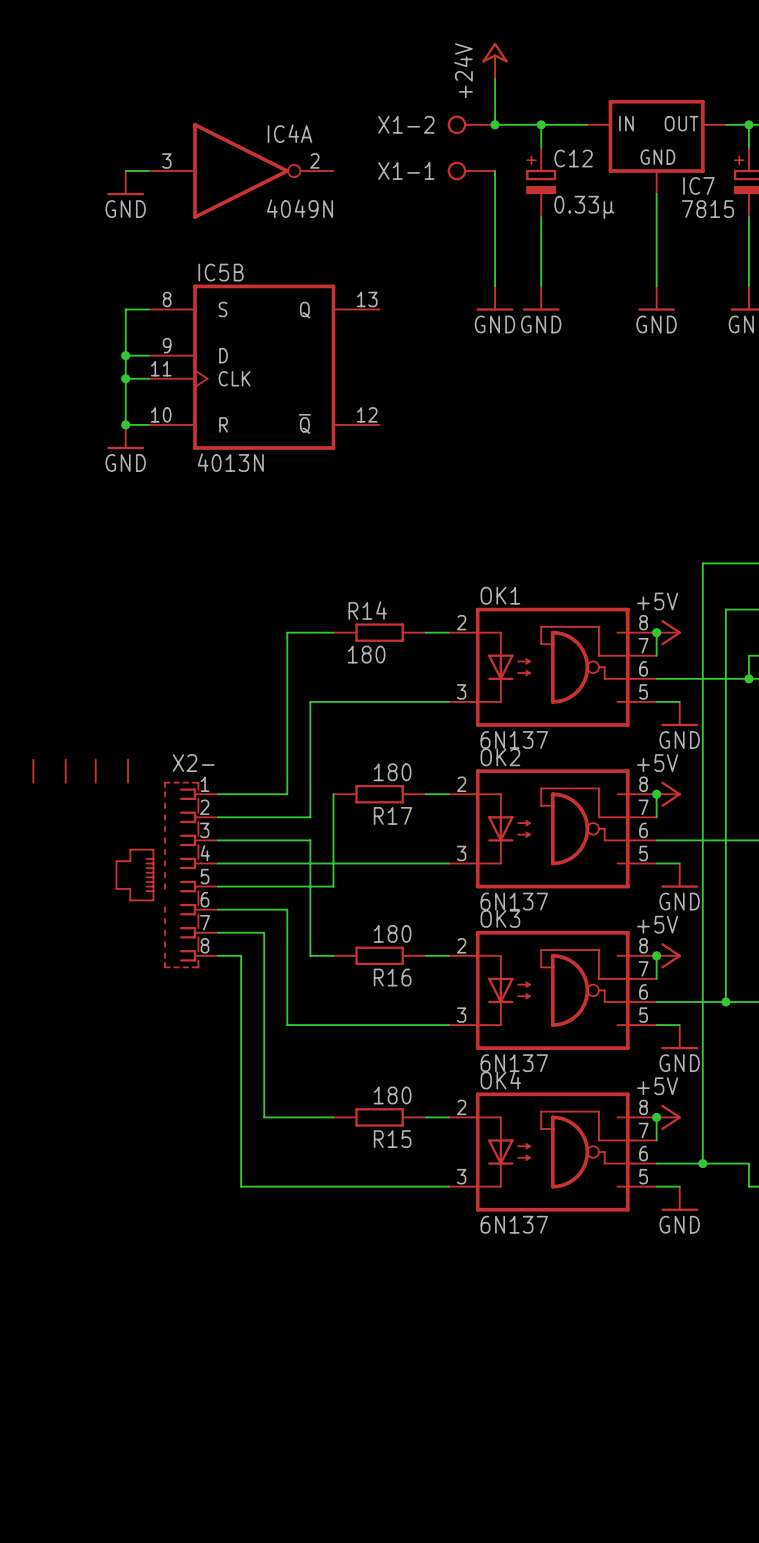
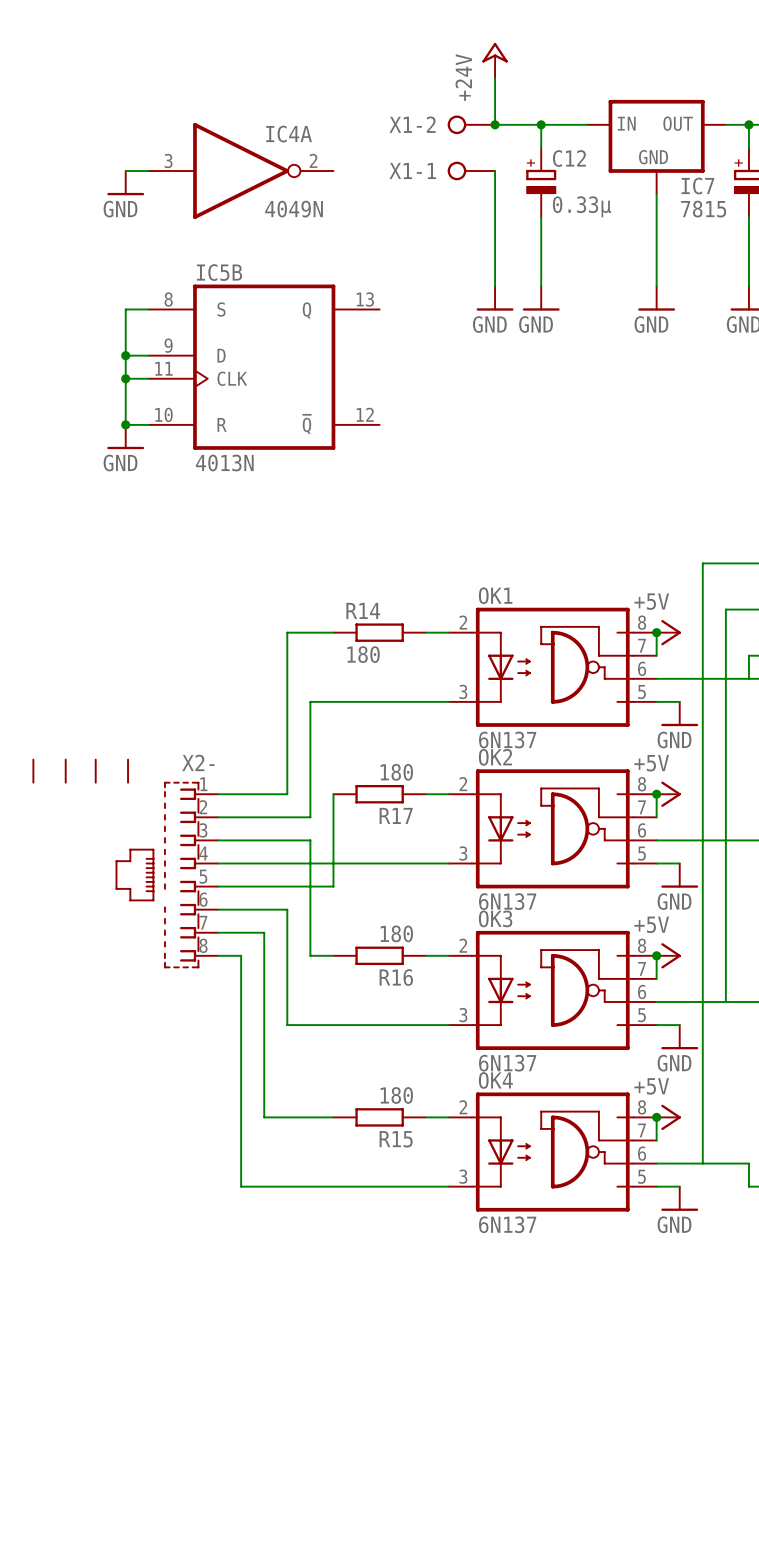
junction: (748, 678) -> none
junction: (725, 1001) -> none
junction: (702, 1163) -> none

